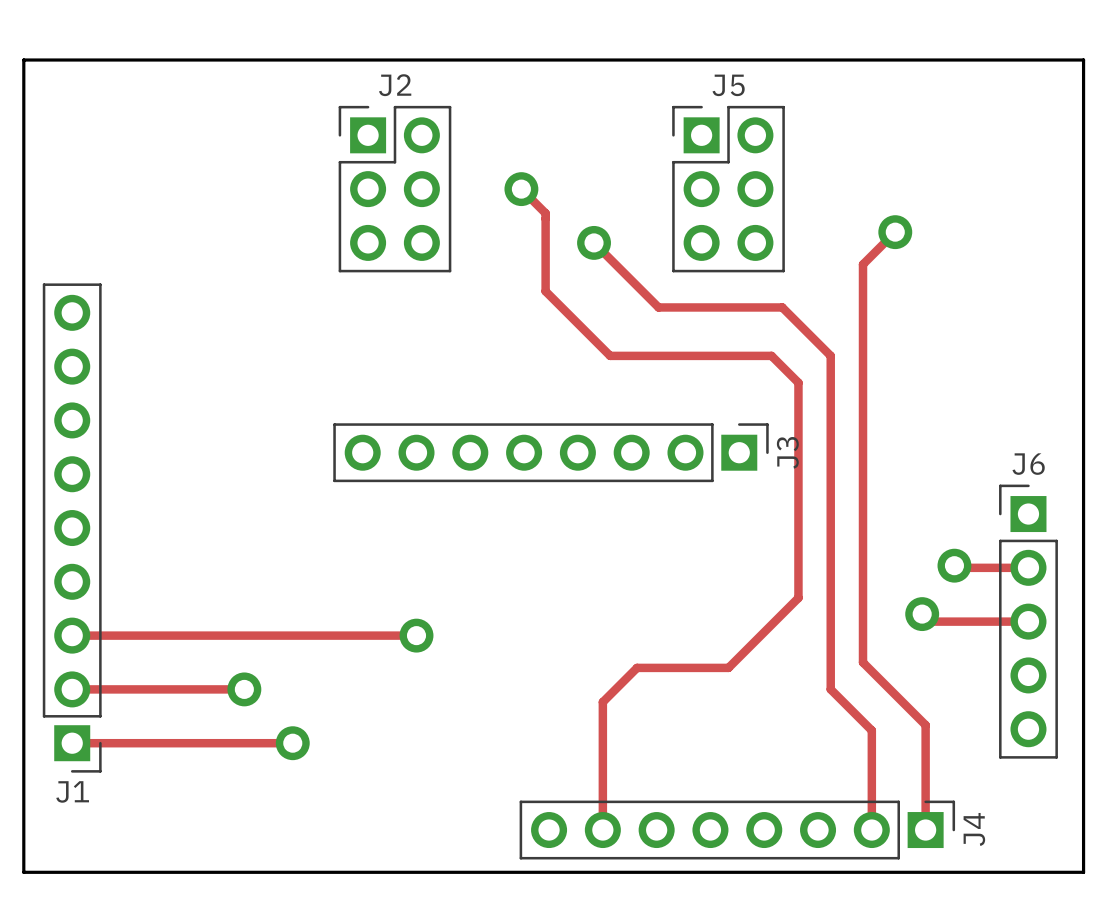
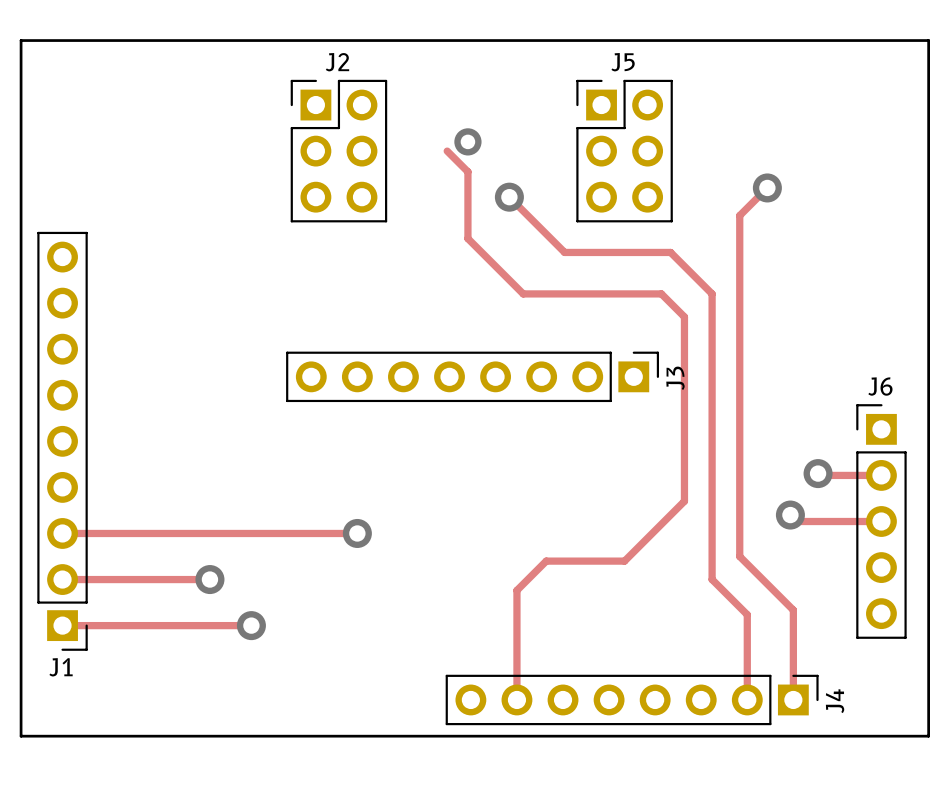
via: none -> (467, 141)
via: (521, 189) -> none

